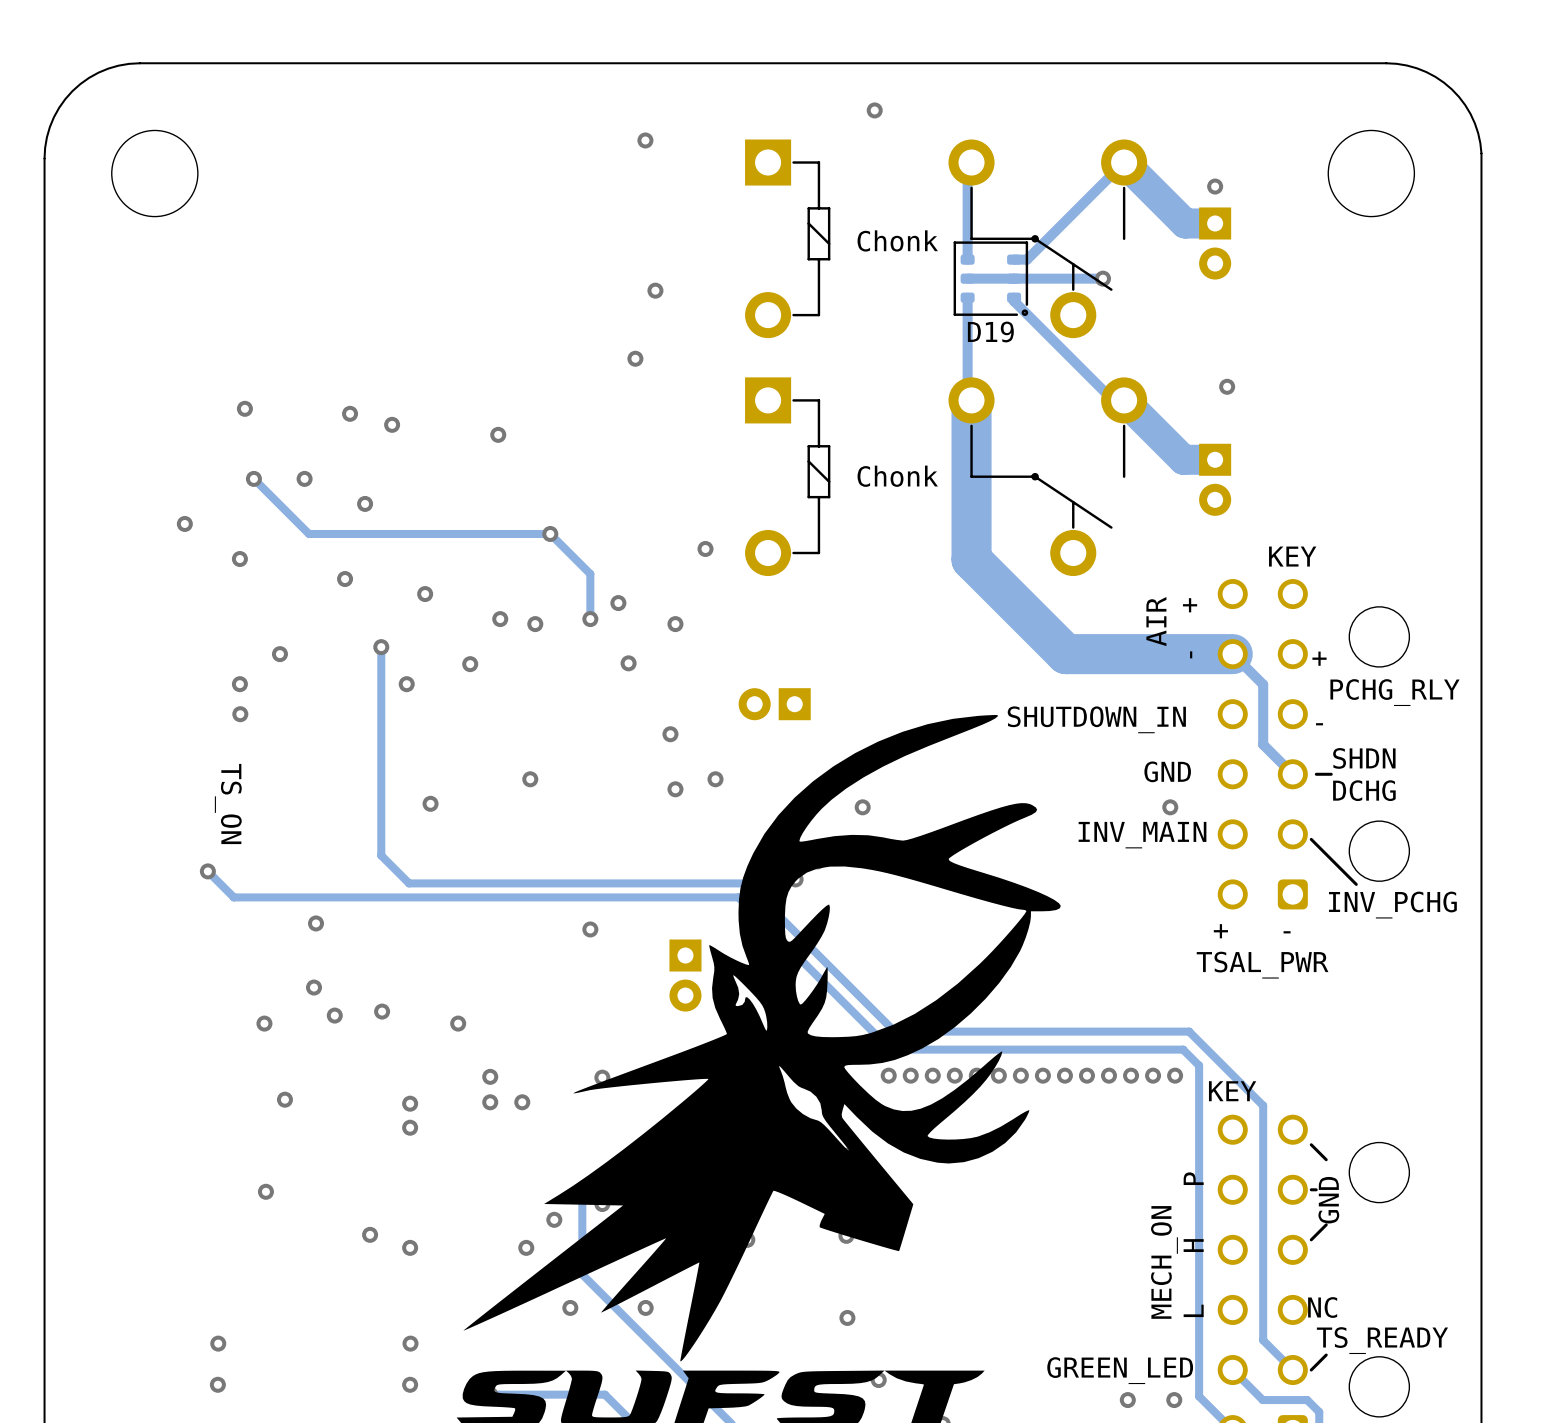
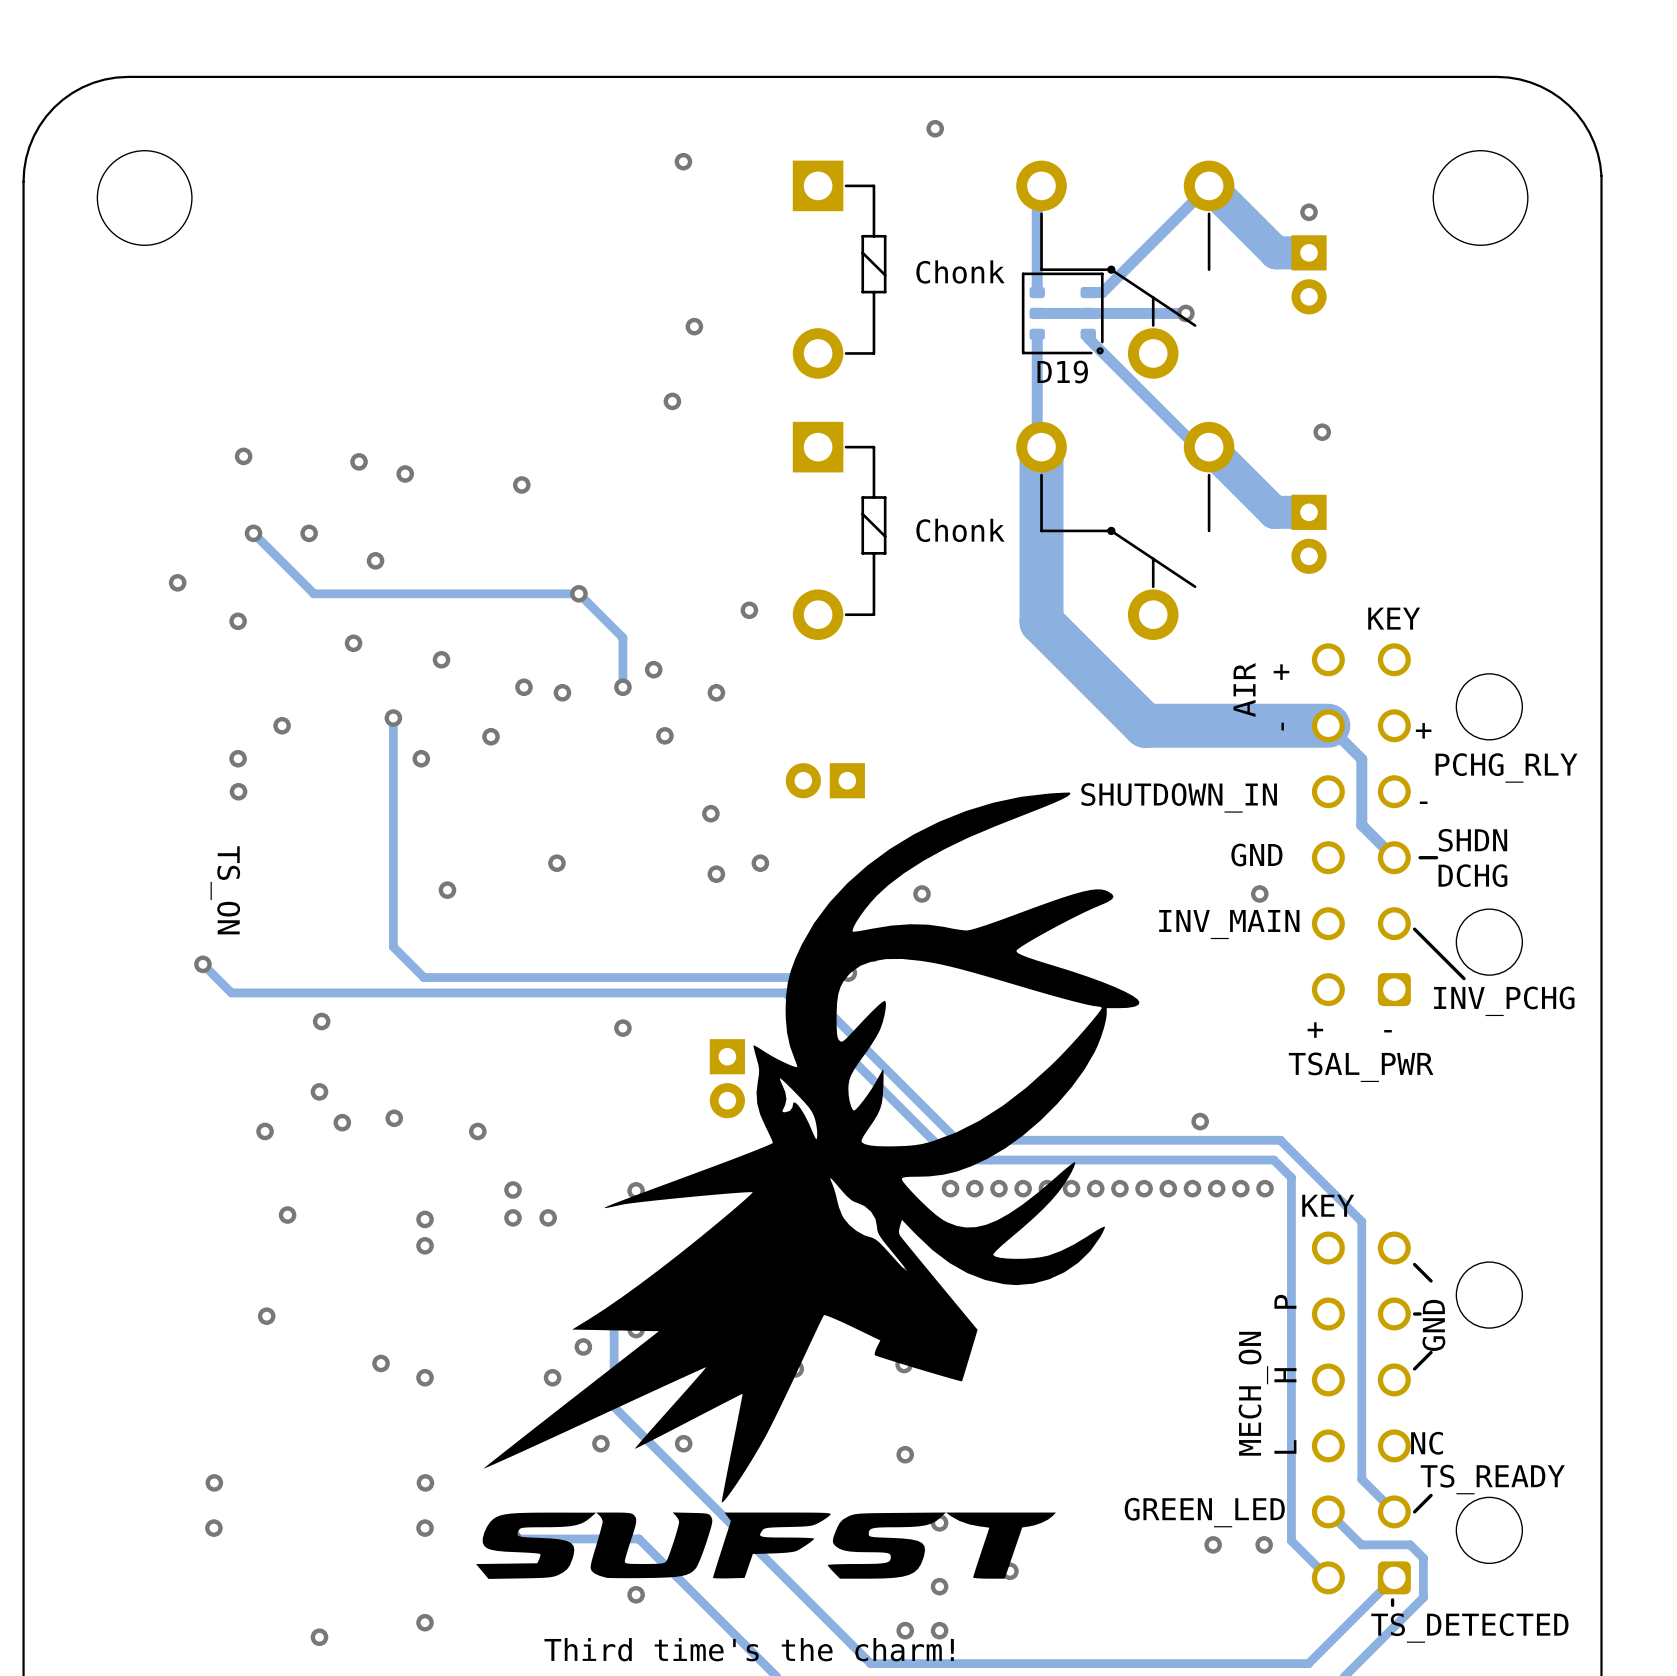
via: none -> (1200, 1121)

